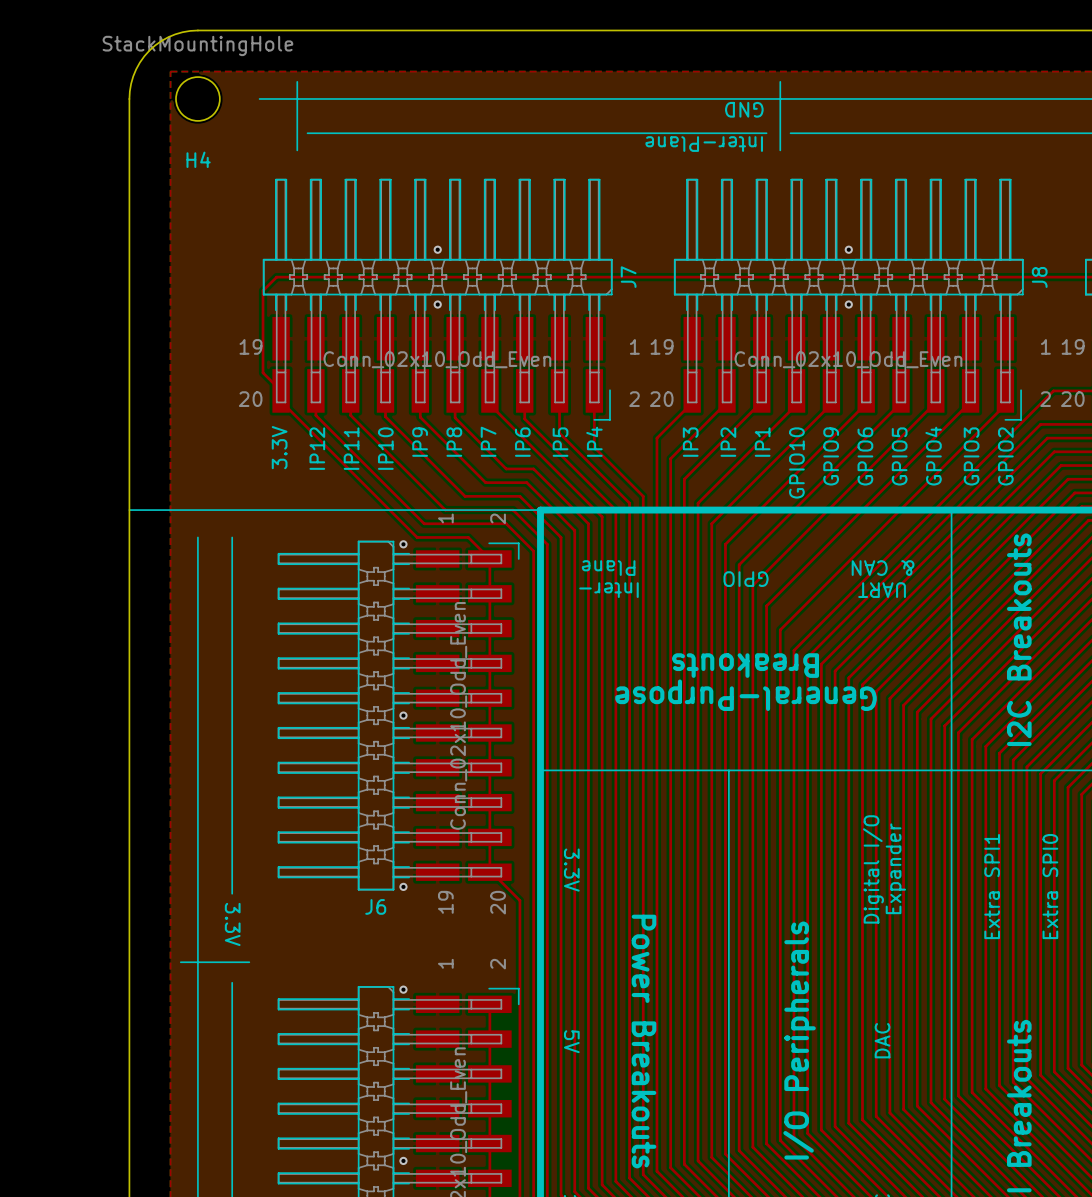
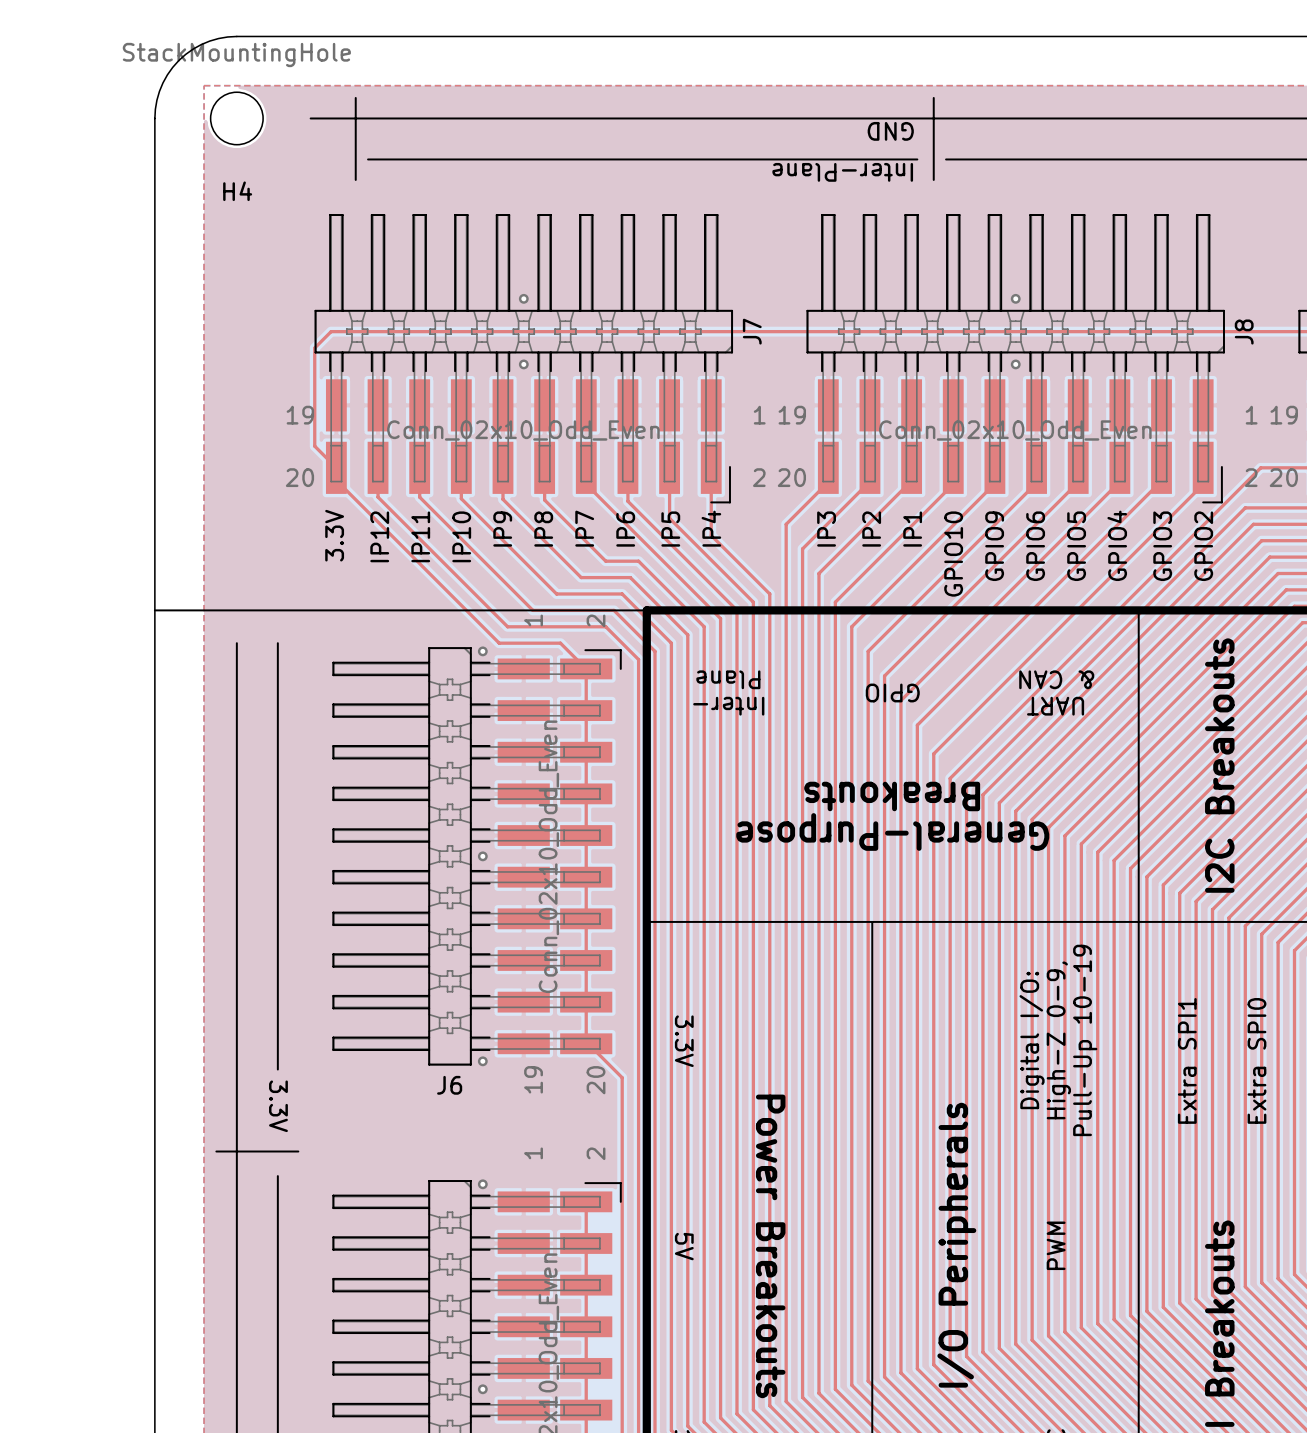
text: Expander (895, 868) -> none
text: Digital I/O (873, 869) -> Digital I/O: (1032, 1040)
text: none -> High-Z 0-9, (1058, 1040)
text: none -> Pull-Up 10-19 (1085, 1040)
text: DAC (882, 1040) -> PWM (1056, 1245)

